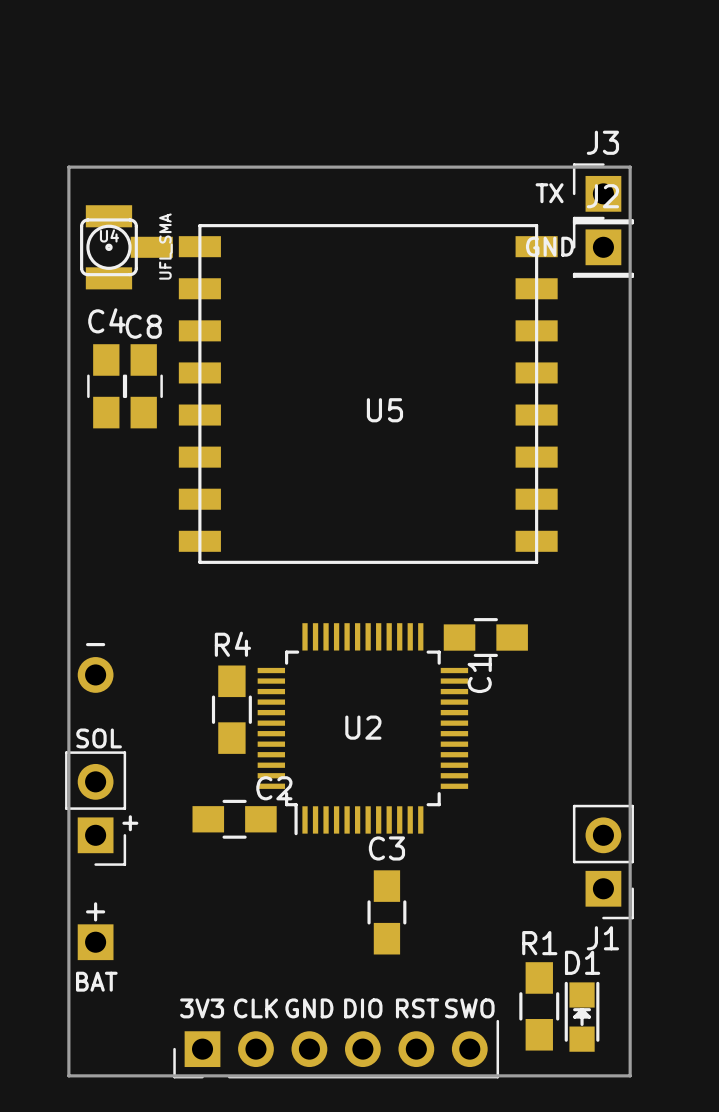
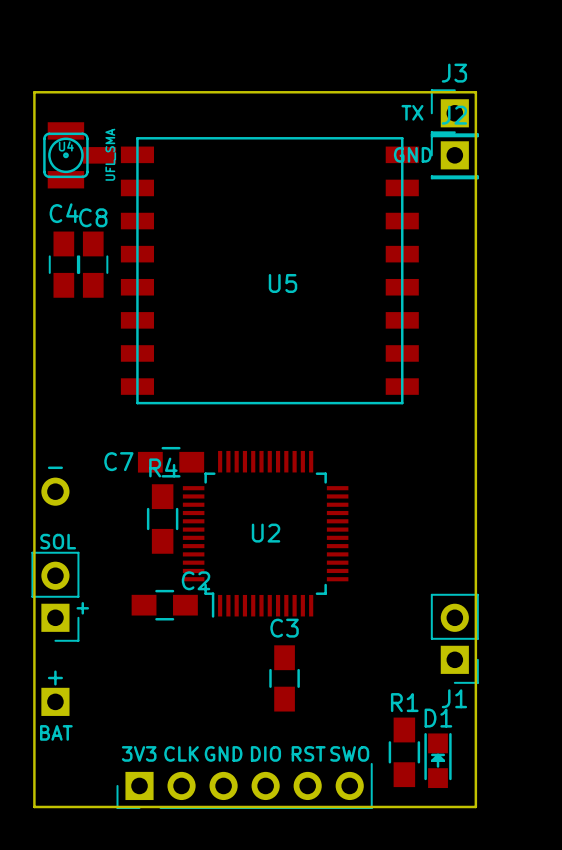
C7: none -> (171, 462)
C1: (485, 637) -> none

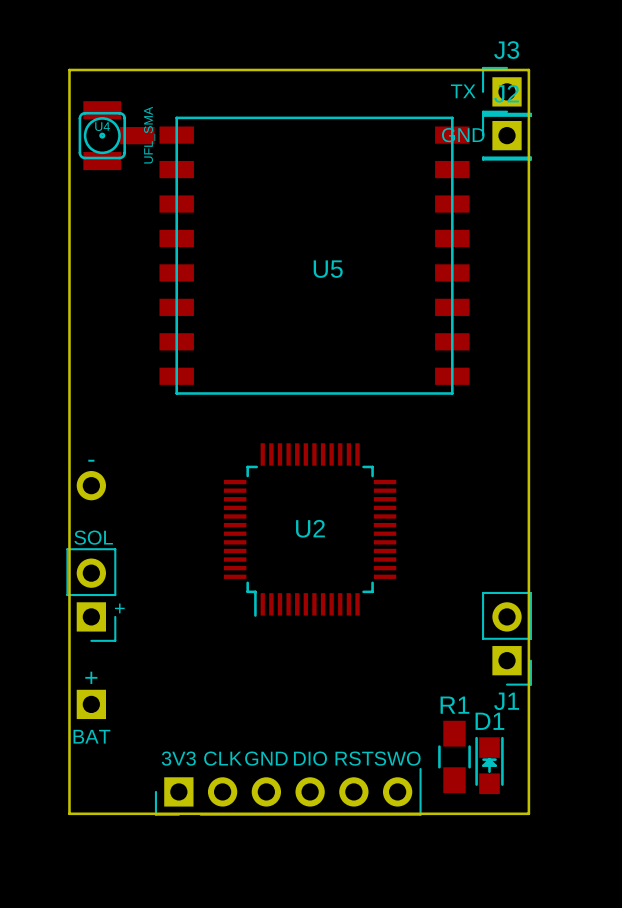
C4: (63, 264) -> none
C8: (93, 264) -> none
C7: (171, 462) -> none
R4: (162, 518) -> none
C2: (164, 605) -> none
C3: (284, 678) -> none

